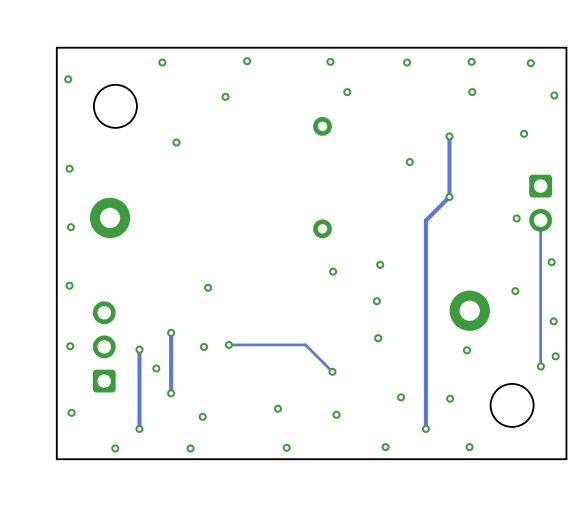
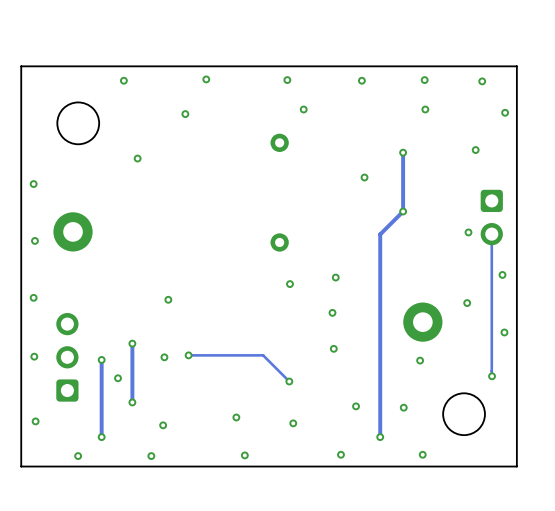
via: (68, 79) -> none
via: (555, 356) -> none

